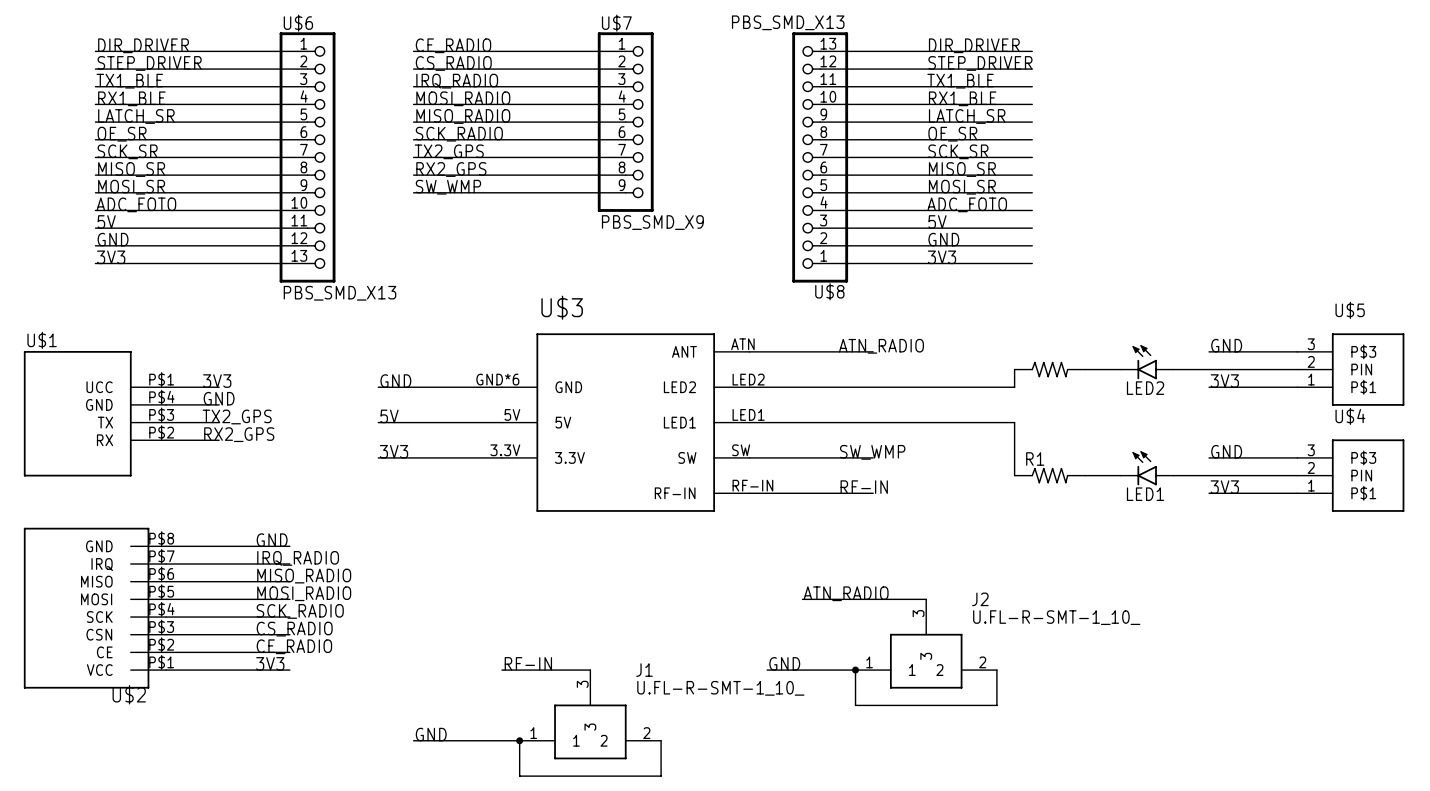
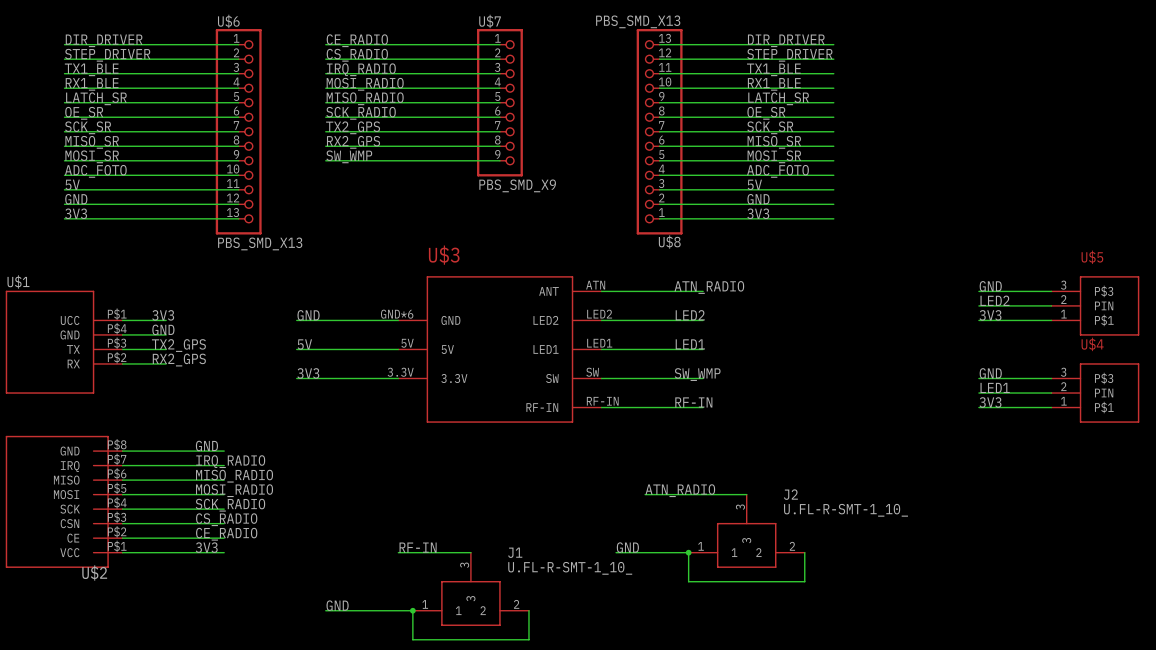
LED2: (1147, 362) -> none
label: none -> LED2 (995, 300)
wire: (1014, 369) (1014, 387) (873, 387) -> none
part: (1049, 369) -> none
wire: (1085, 369) (1120, 369) -> none
wire: (1173, 369) (1209, 369) -> none
label: none -> LED2 (690, 315)
label: none -> LED1 (690, 344)
wire: (873, 422) (1014, 422) (1014, 475) -> none
LED1: (1147, 468) -> none
label: none -> LED1 (995, 387)
R1: (1049, 475) -> none
wire: (1085, 475) (1120, 475) -> none
wire: (1173, 475) (1209, 475) -> none

